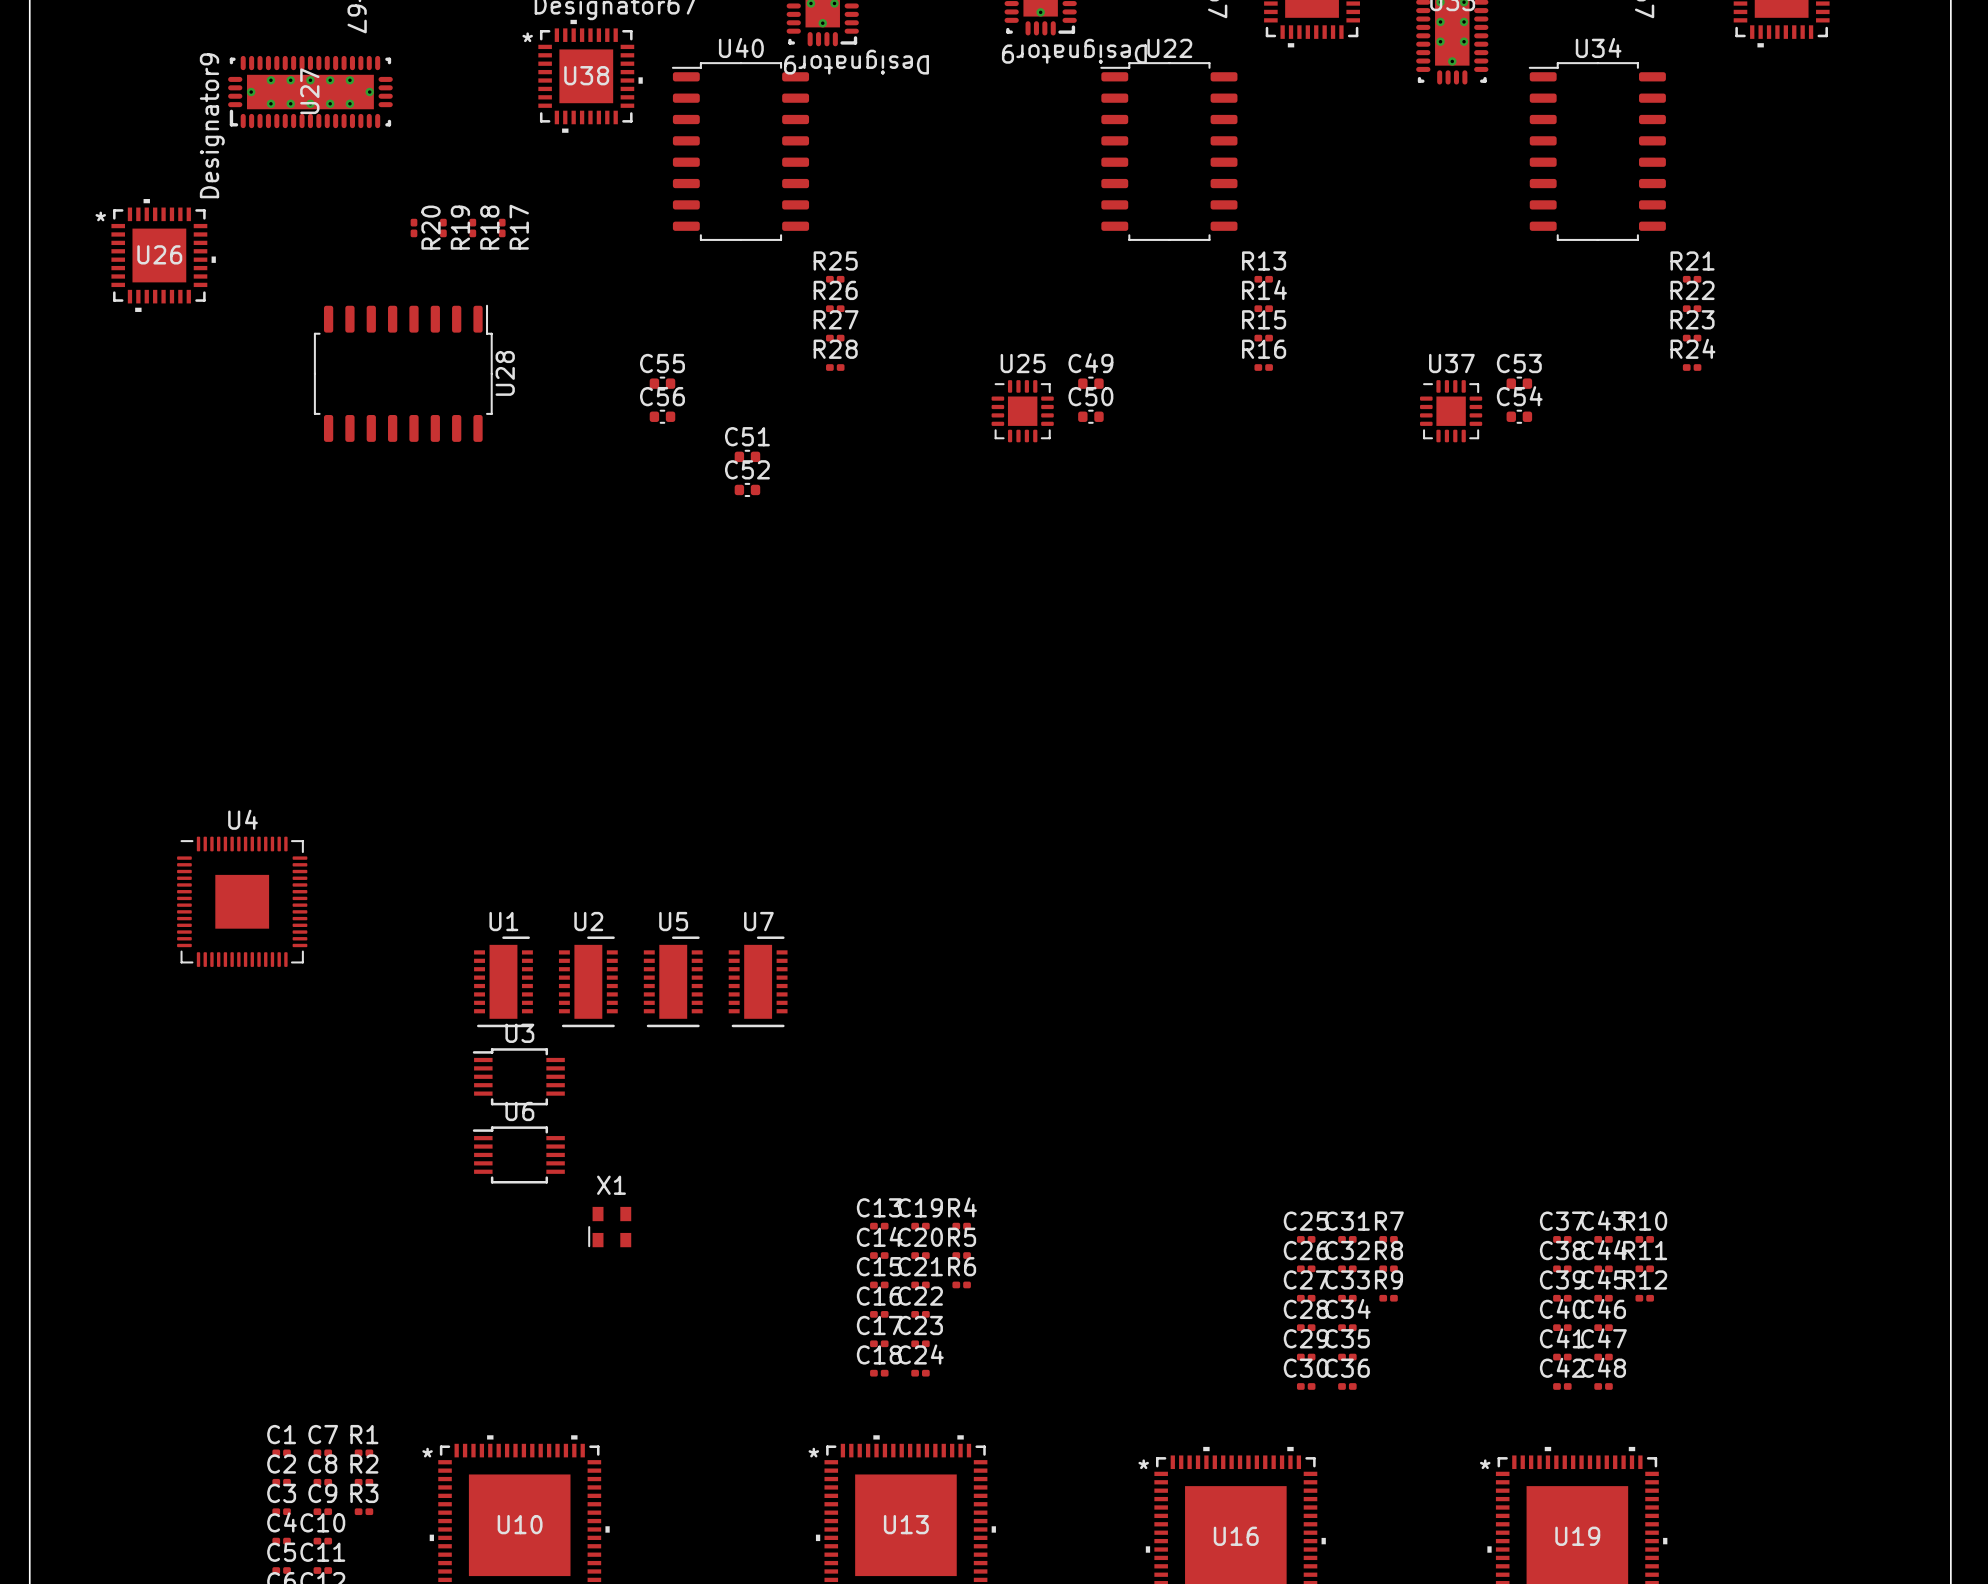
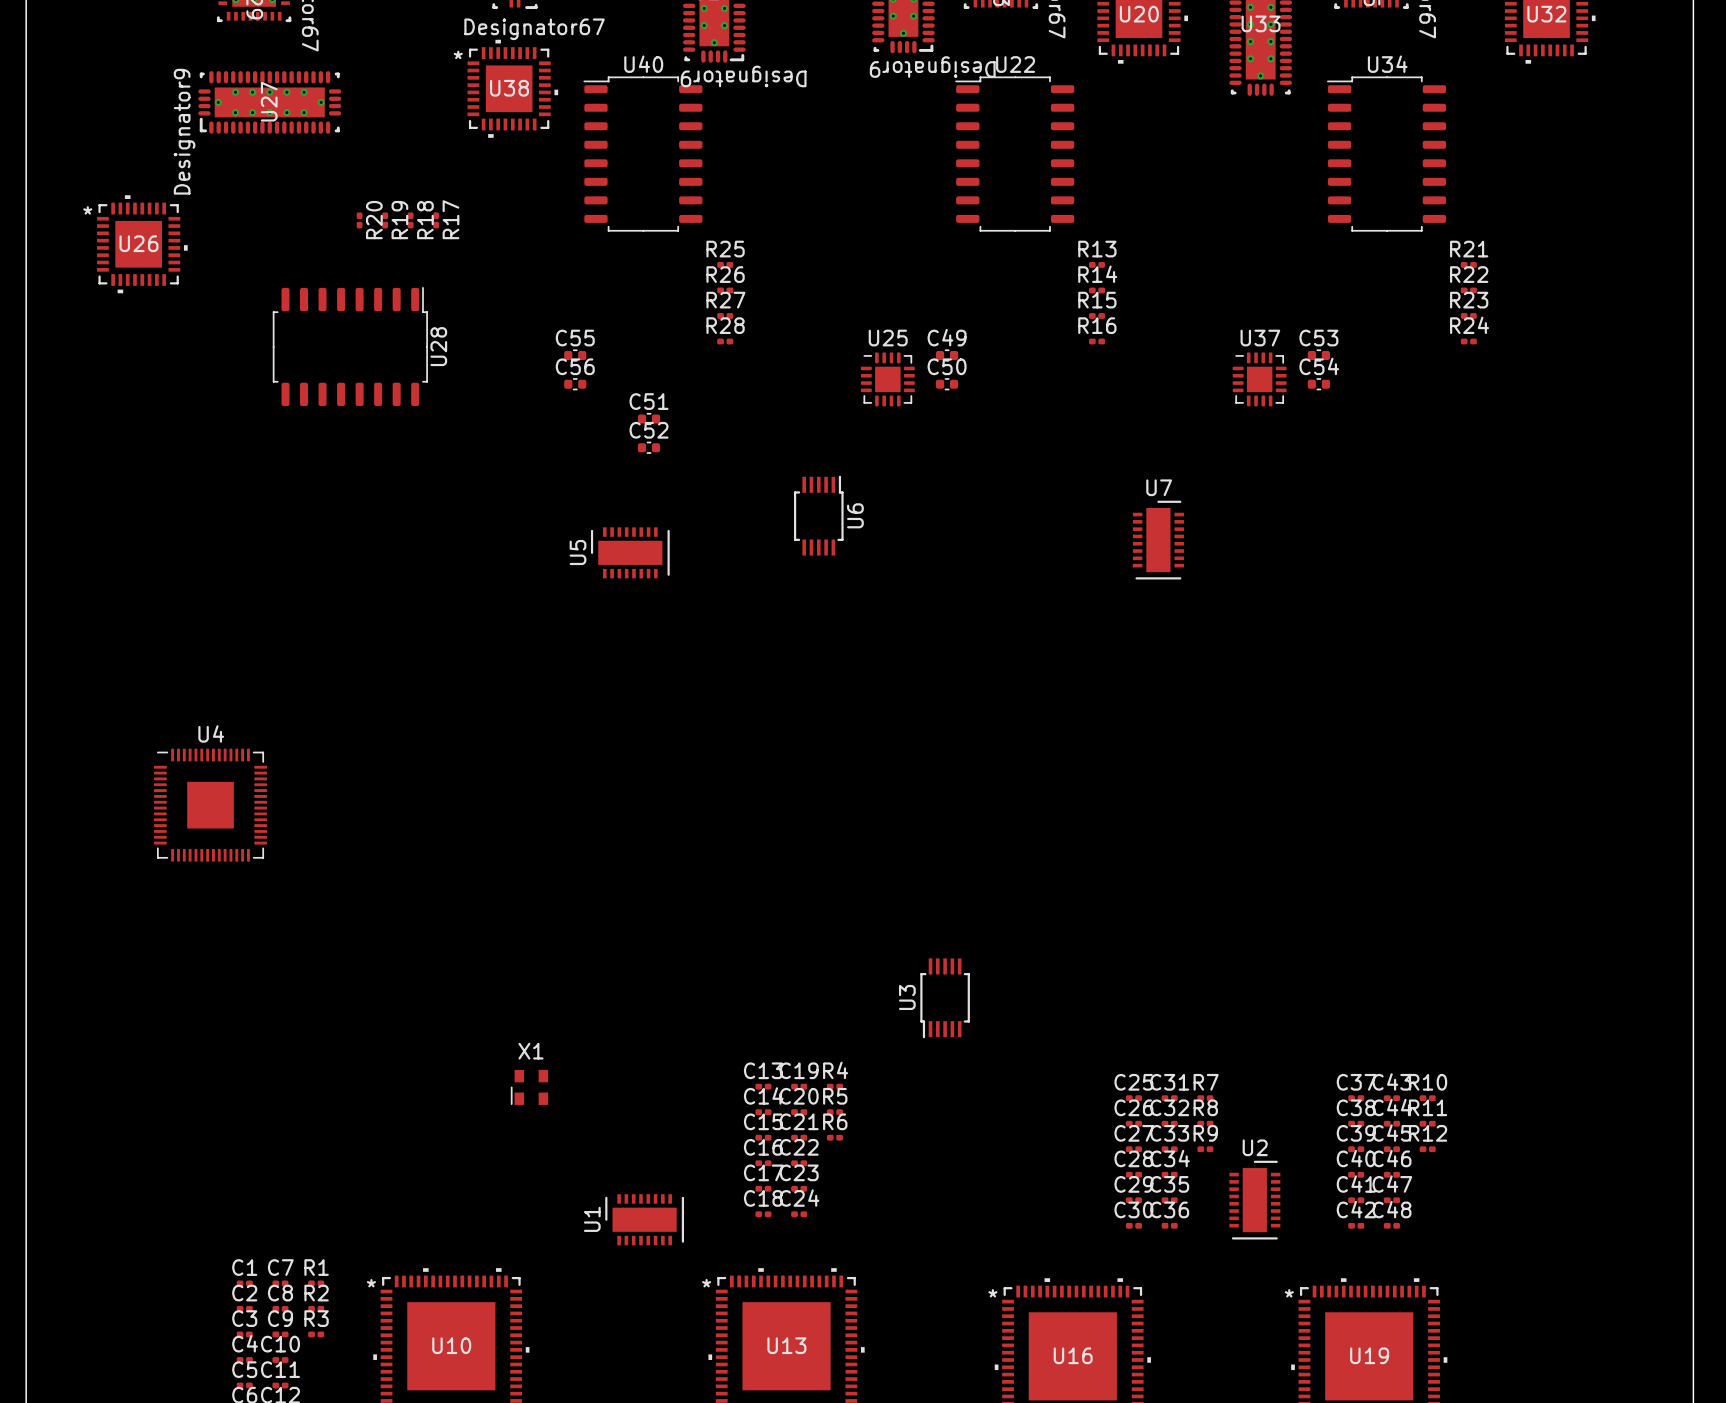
U1 rotation: 0° (503, 981) -> 90° counterclockwise (644, 1219)
U1 position: (503, 981) -> (644, 1219)
U2 position: (588, 981) -> (1254, 1200)
U5 rotation: 0° (673, 981) -> 90° counterclockwise (630, 552)
U5 position: (673, 981) -> (630, 552)
U7 position: (758, 981) -> (1158, 540)
U3 rotation: 0° (518, 1076) -> 90° counterclockwise (945, 998)
U3 position: (518, 1076) -> (945, 998)
U6 rotation: 0° (518, 1154) -> 90° clockwise (818, 515)
U6 position: (518, 1154) -> (818, 515)

